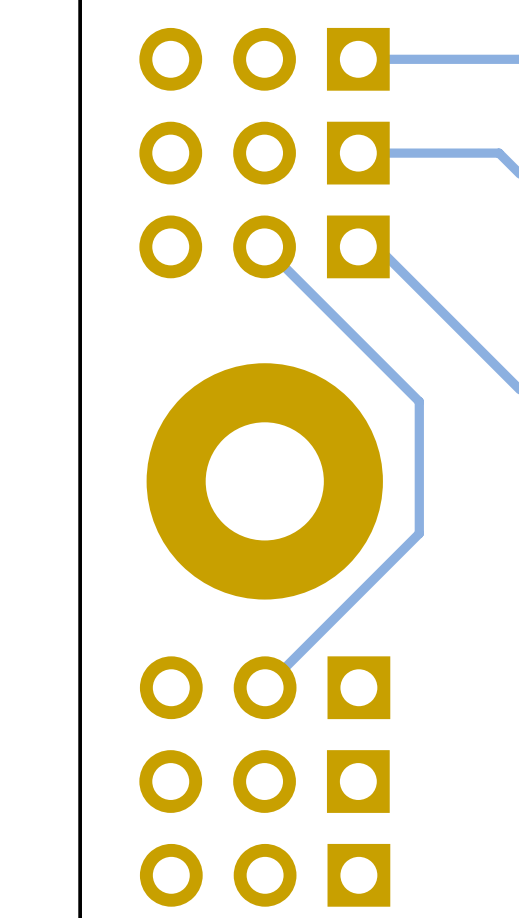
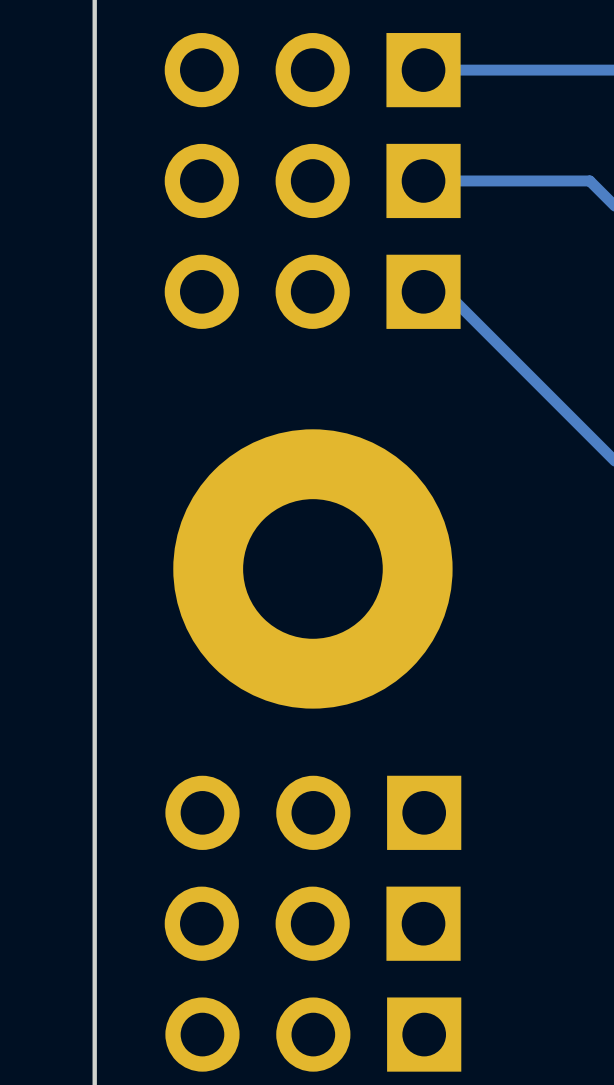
track: (264, 246) (419, 401) (419, 533) (265, 687) -> none

